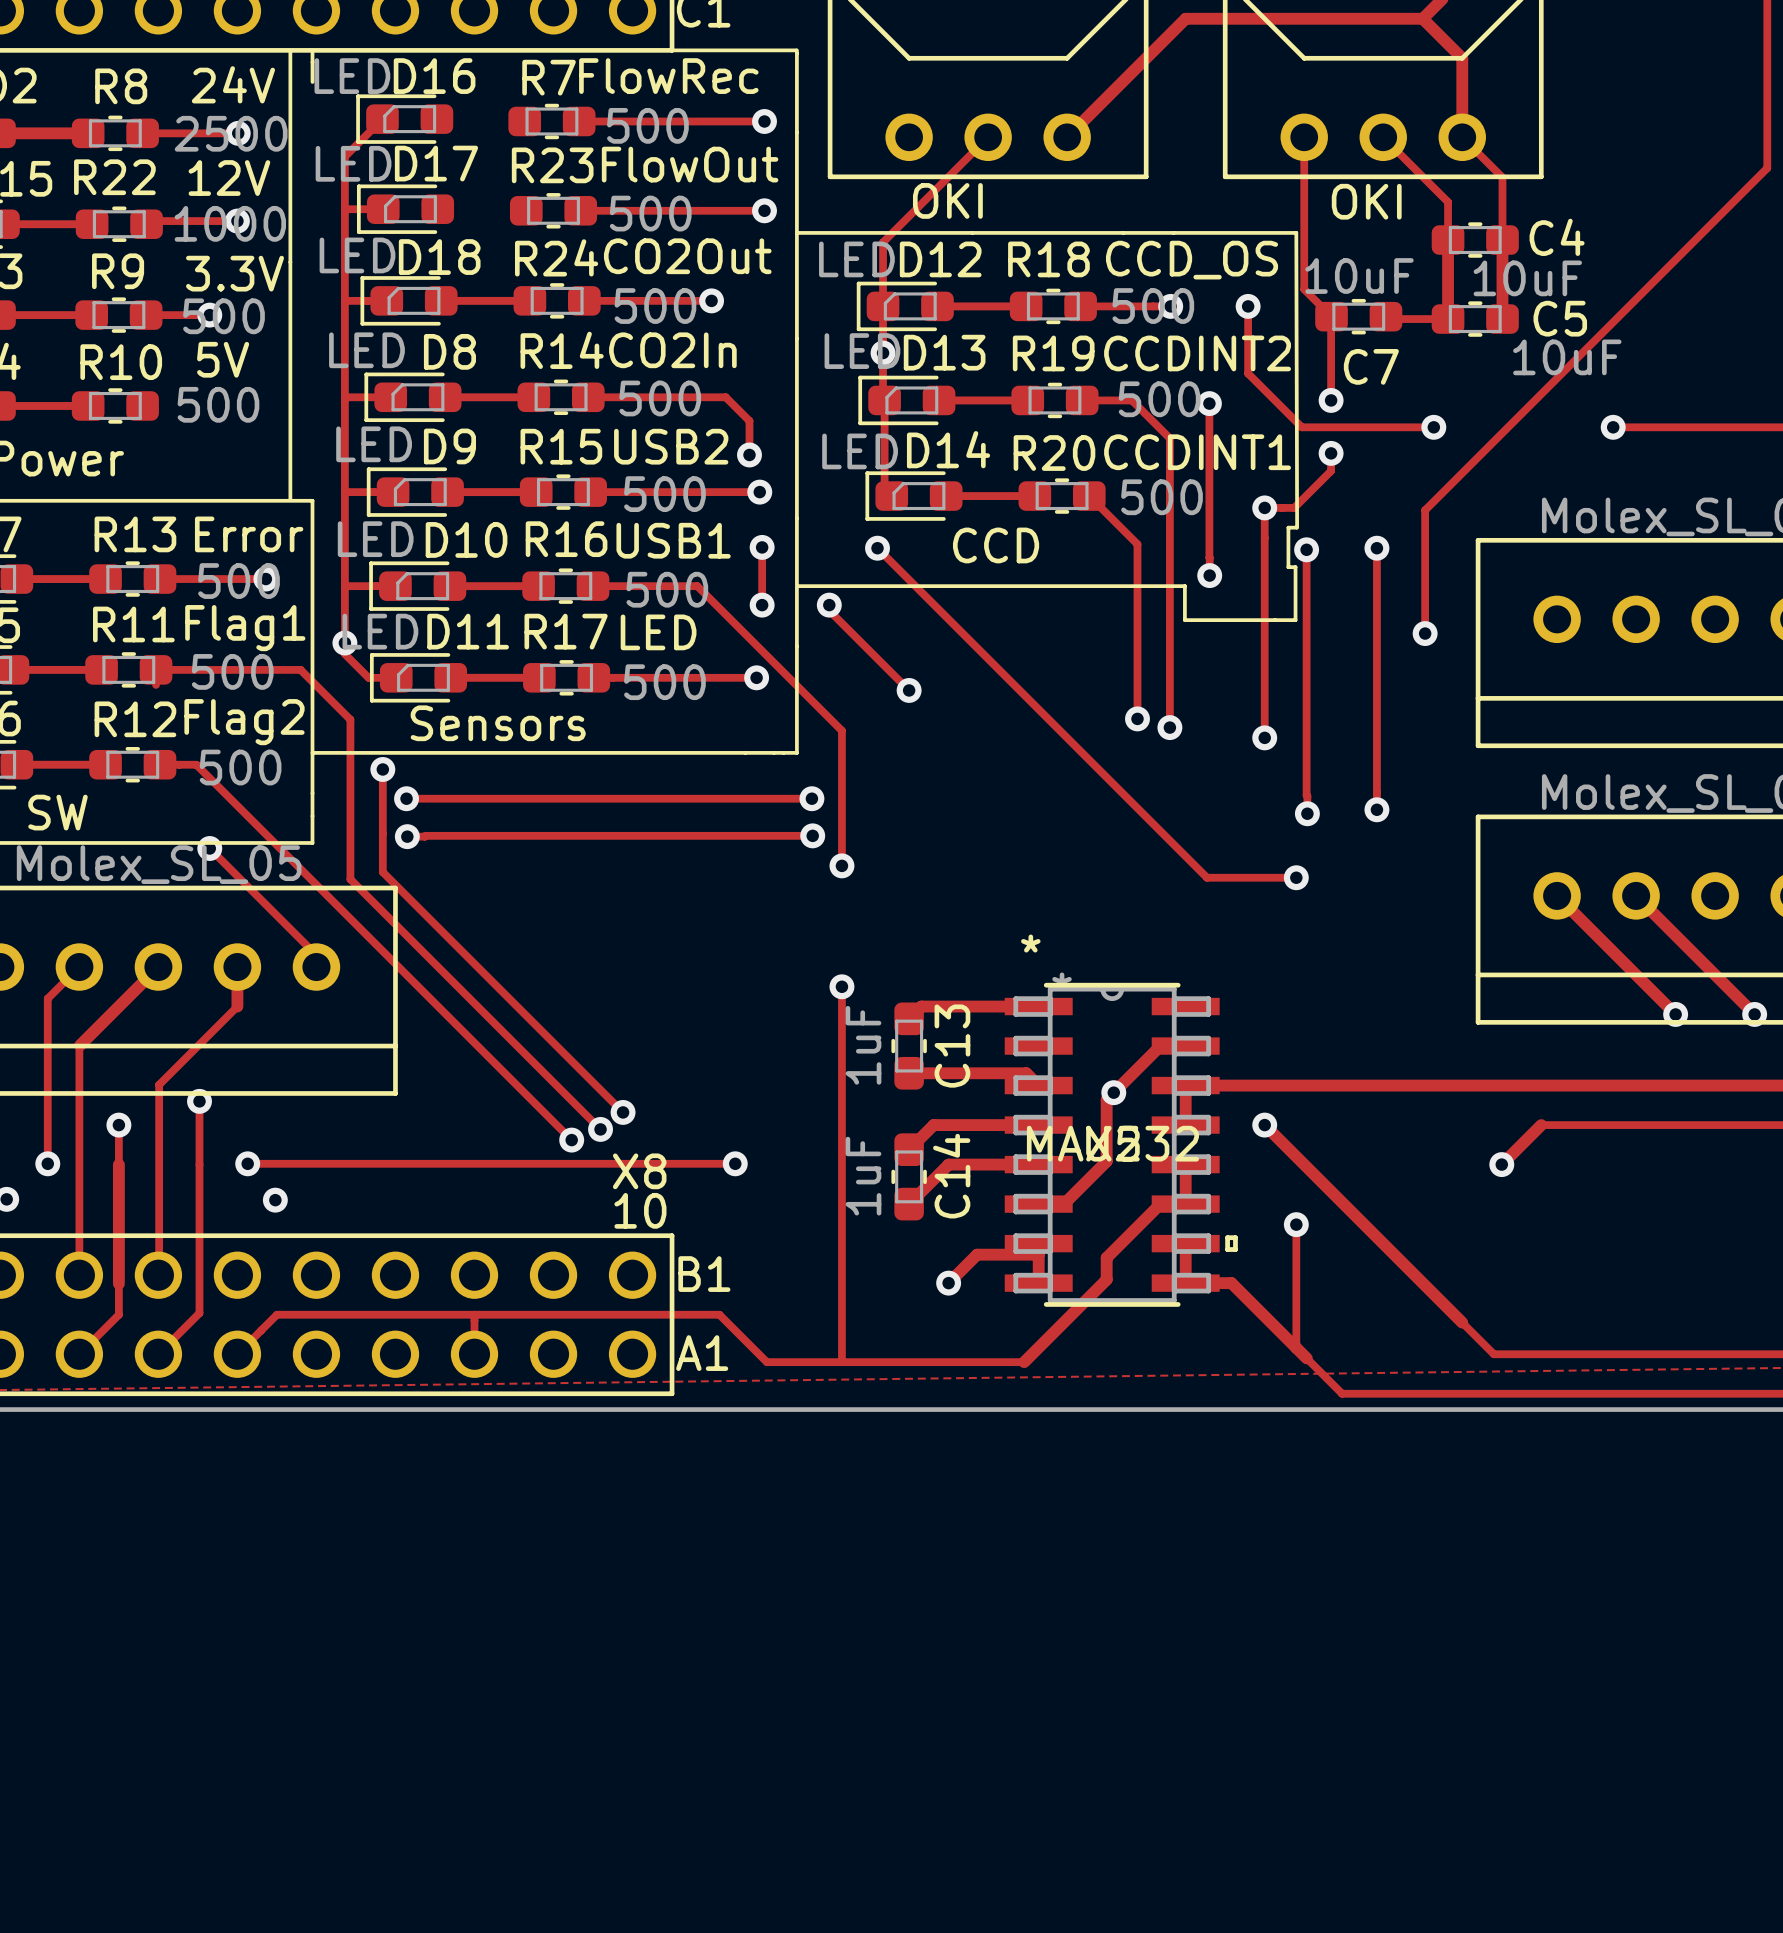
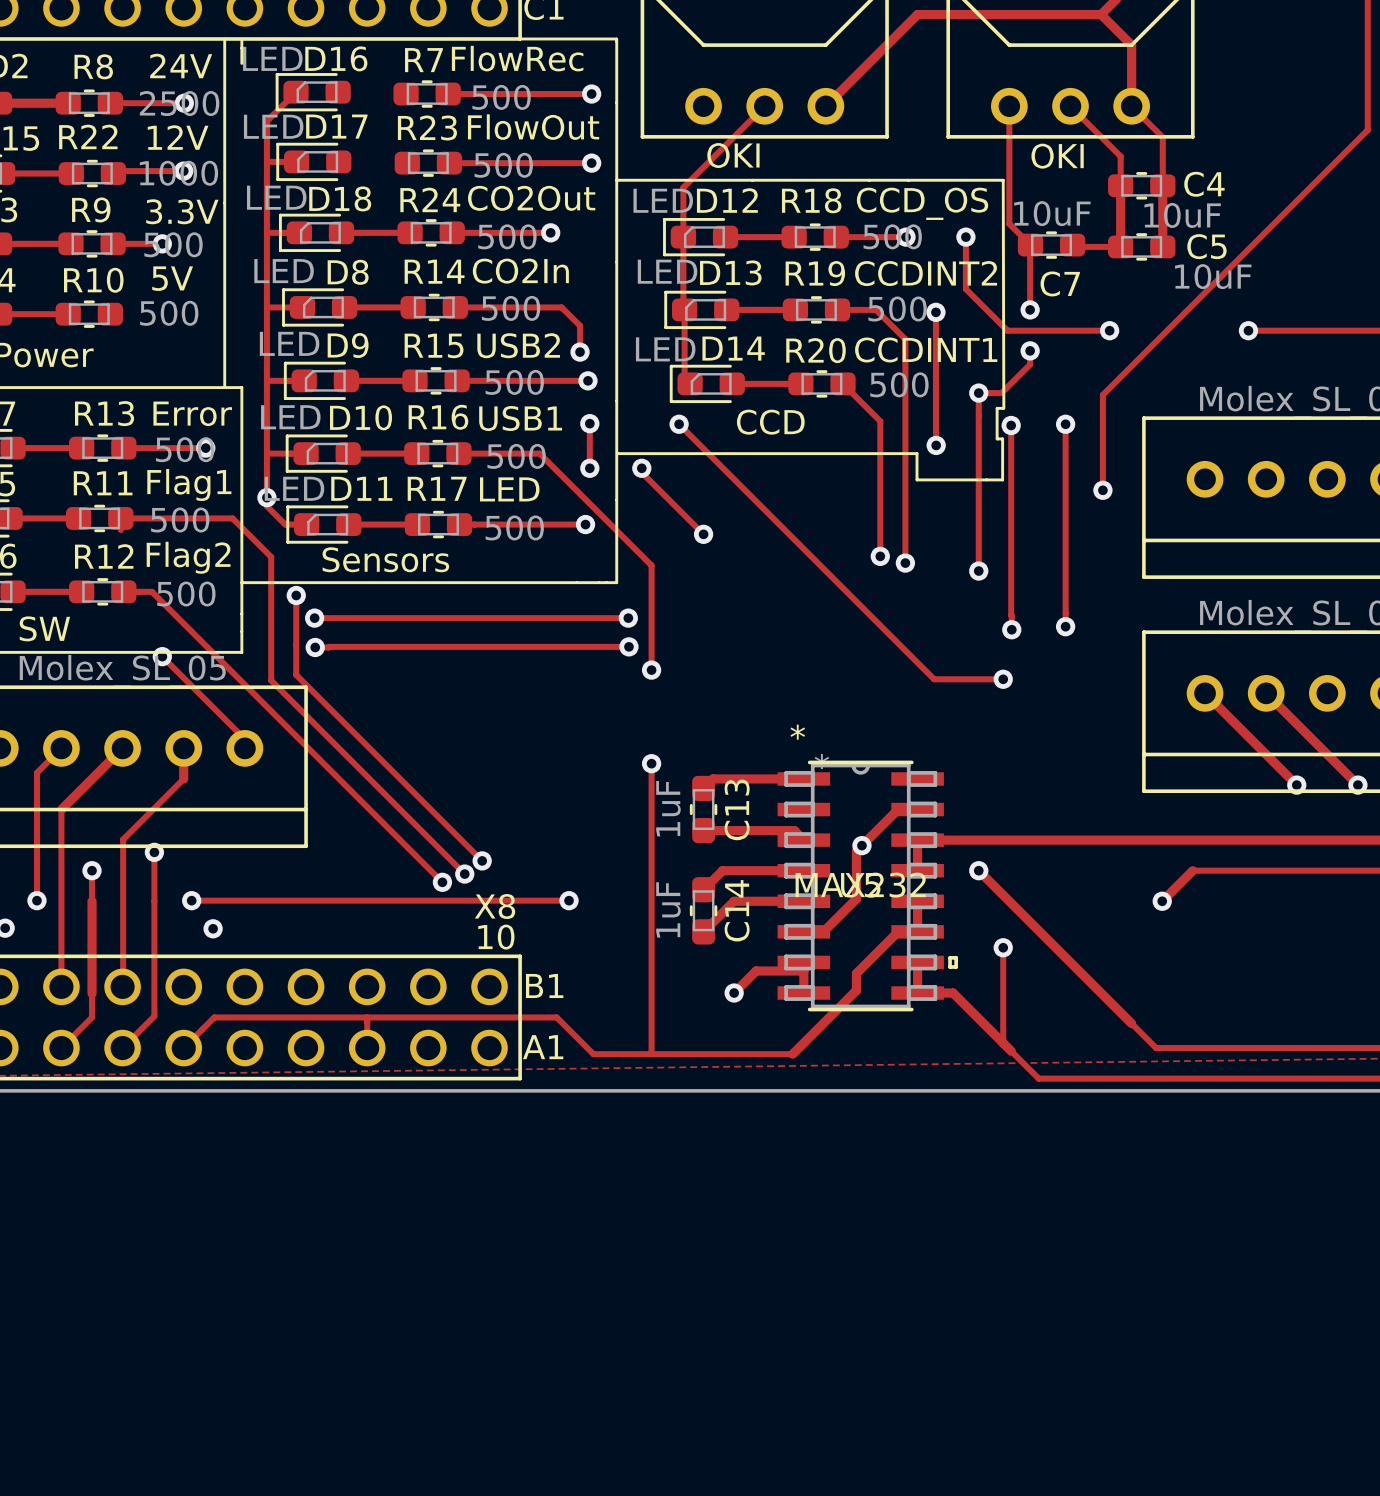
via: (883, 353) -> none

